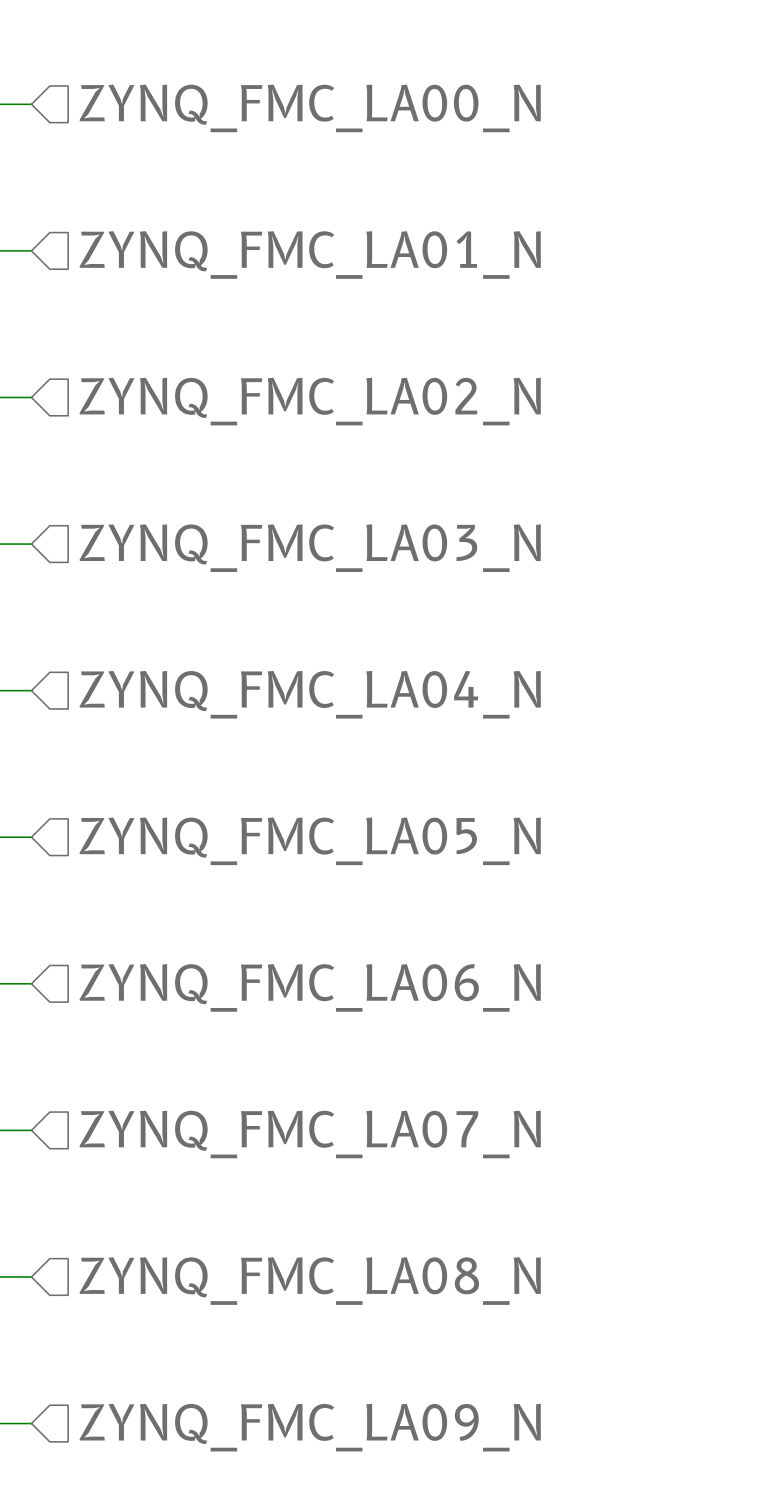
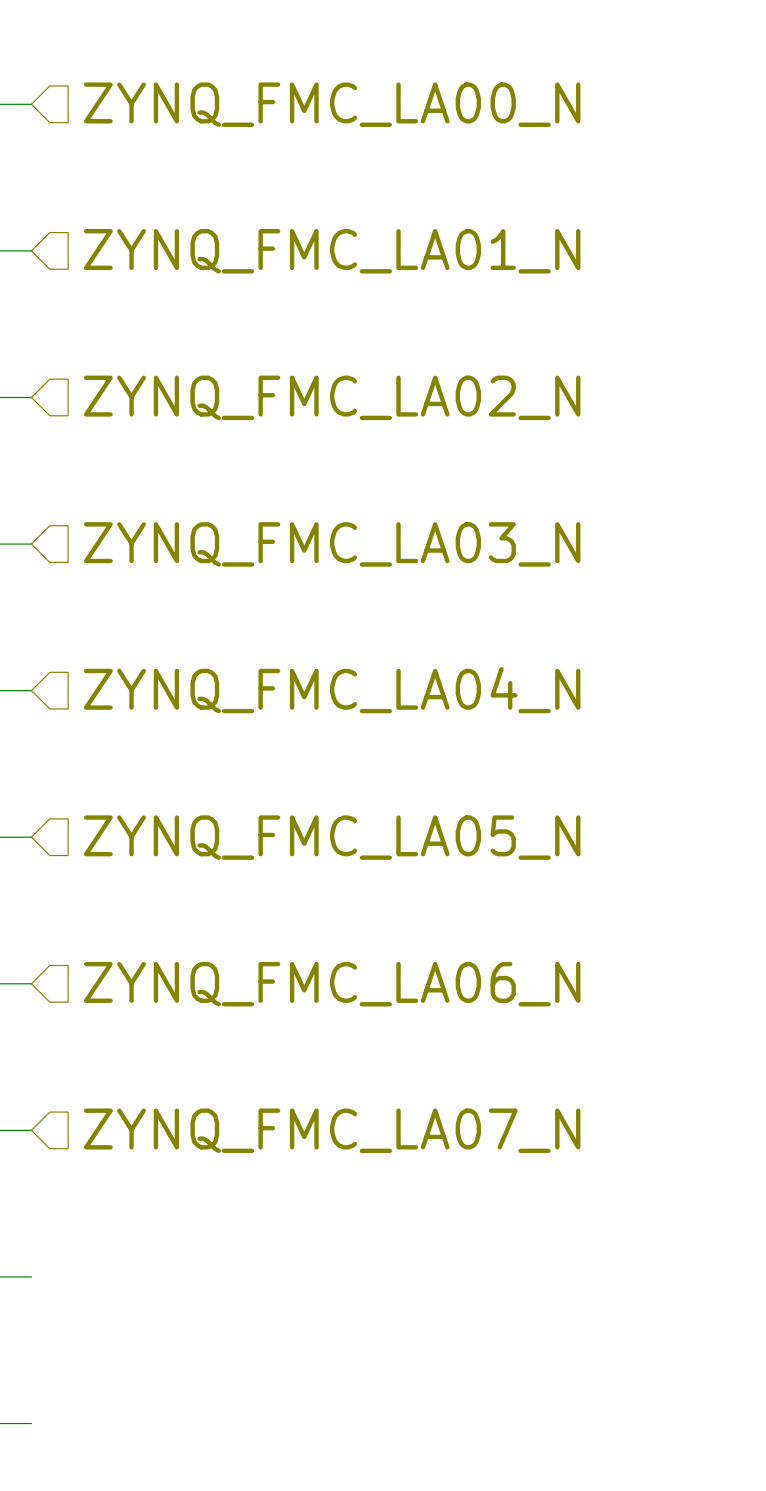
hierarchical label: ZYNQ_FMC_LA08_N (310, 1281) -> none
hierarchical label: ZYNQ_FMC_LA09_N (310, 1427) -> none

